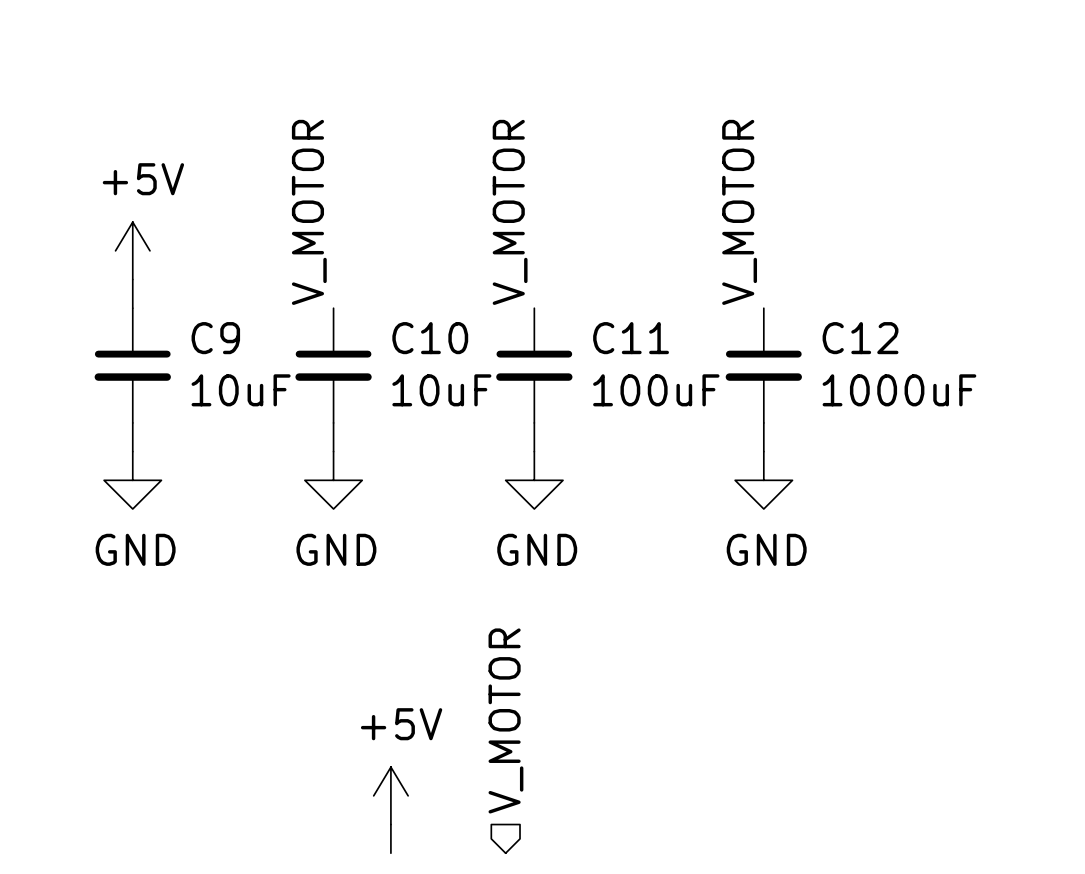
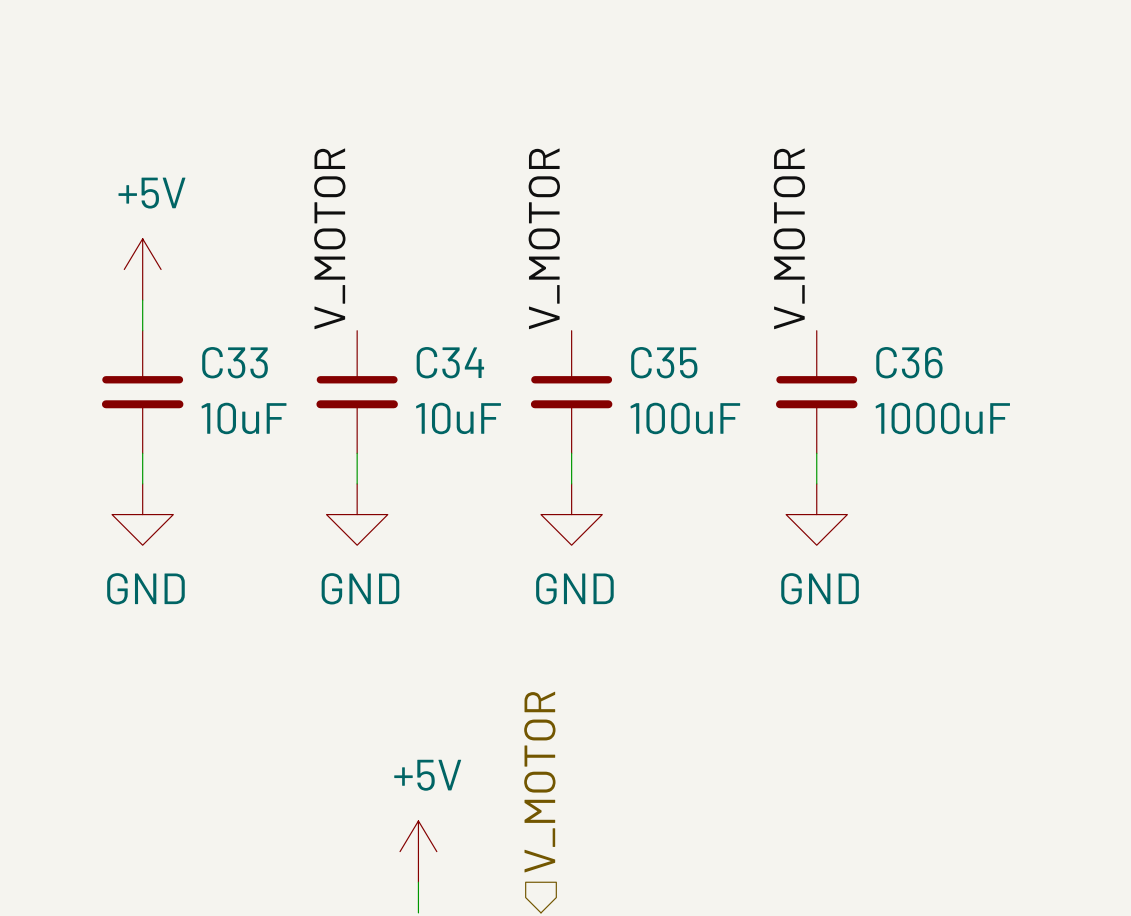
C9 name: C9 (215, 338) -> C33 (235, 362)
C10 name: C10 (430, 338) -> C34 (450, 362)
C11 name: C11 (631, 338) -> C35 (664, 362)
C12 name: C12 (860, 338) -> C36 (909, 362)

